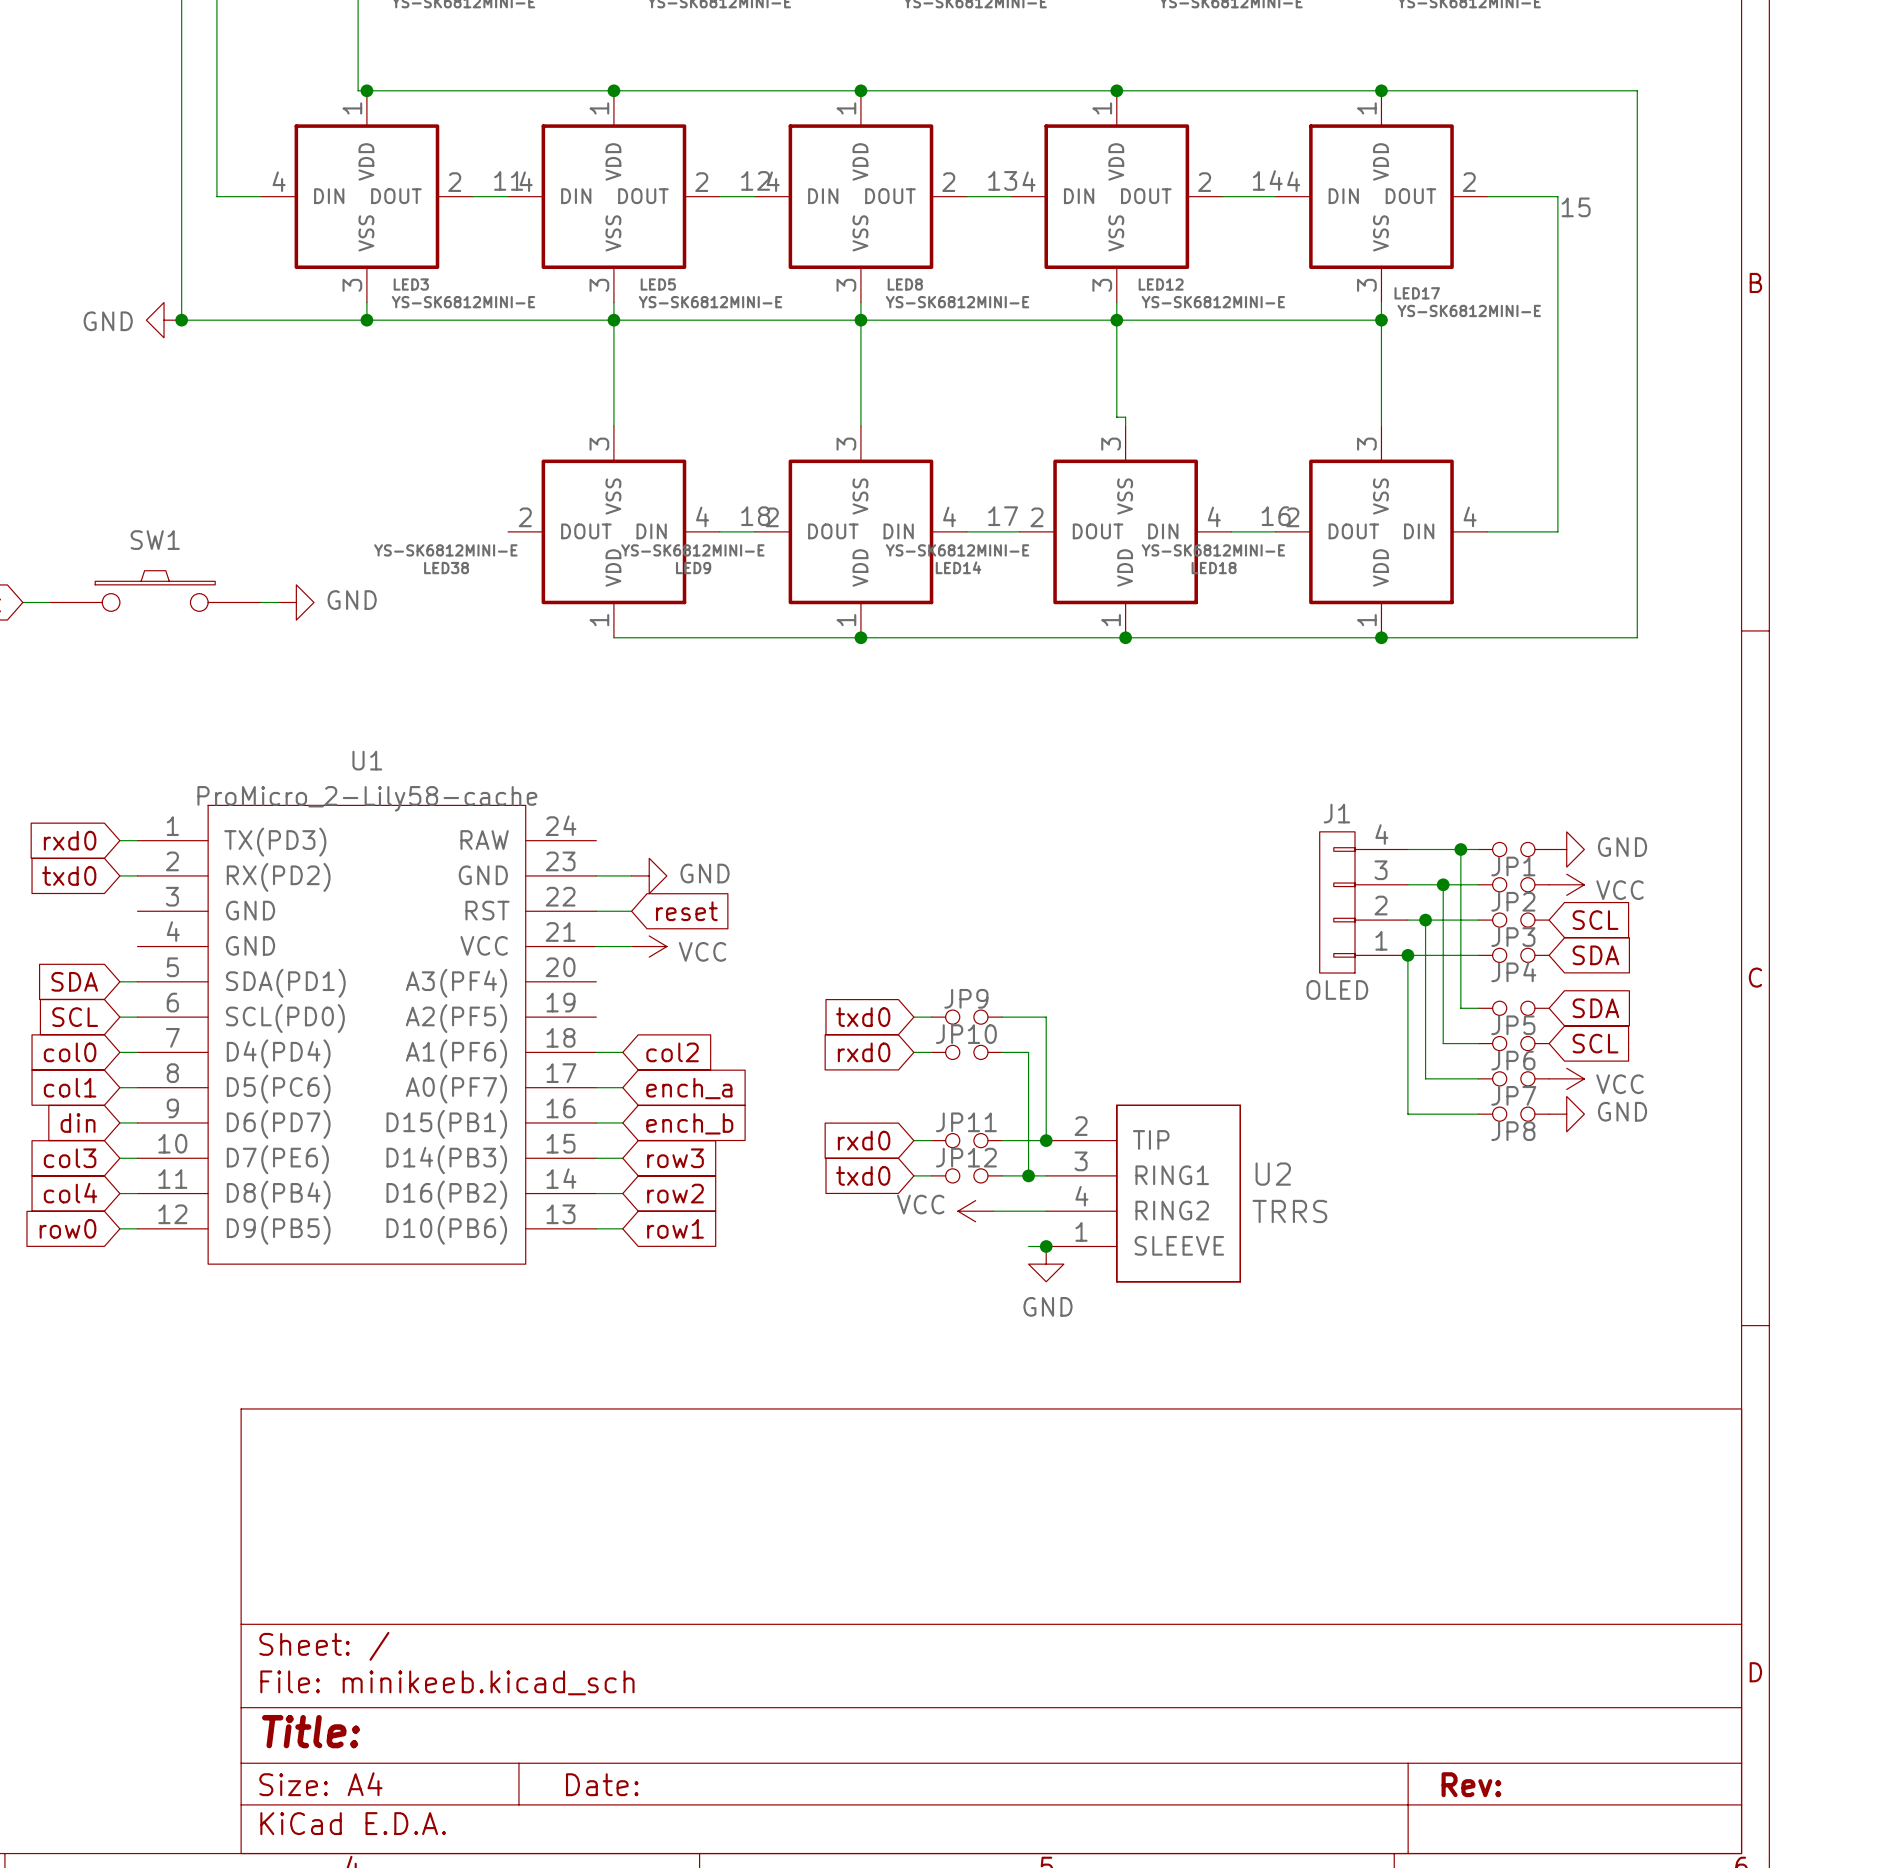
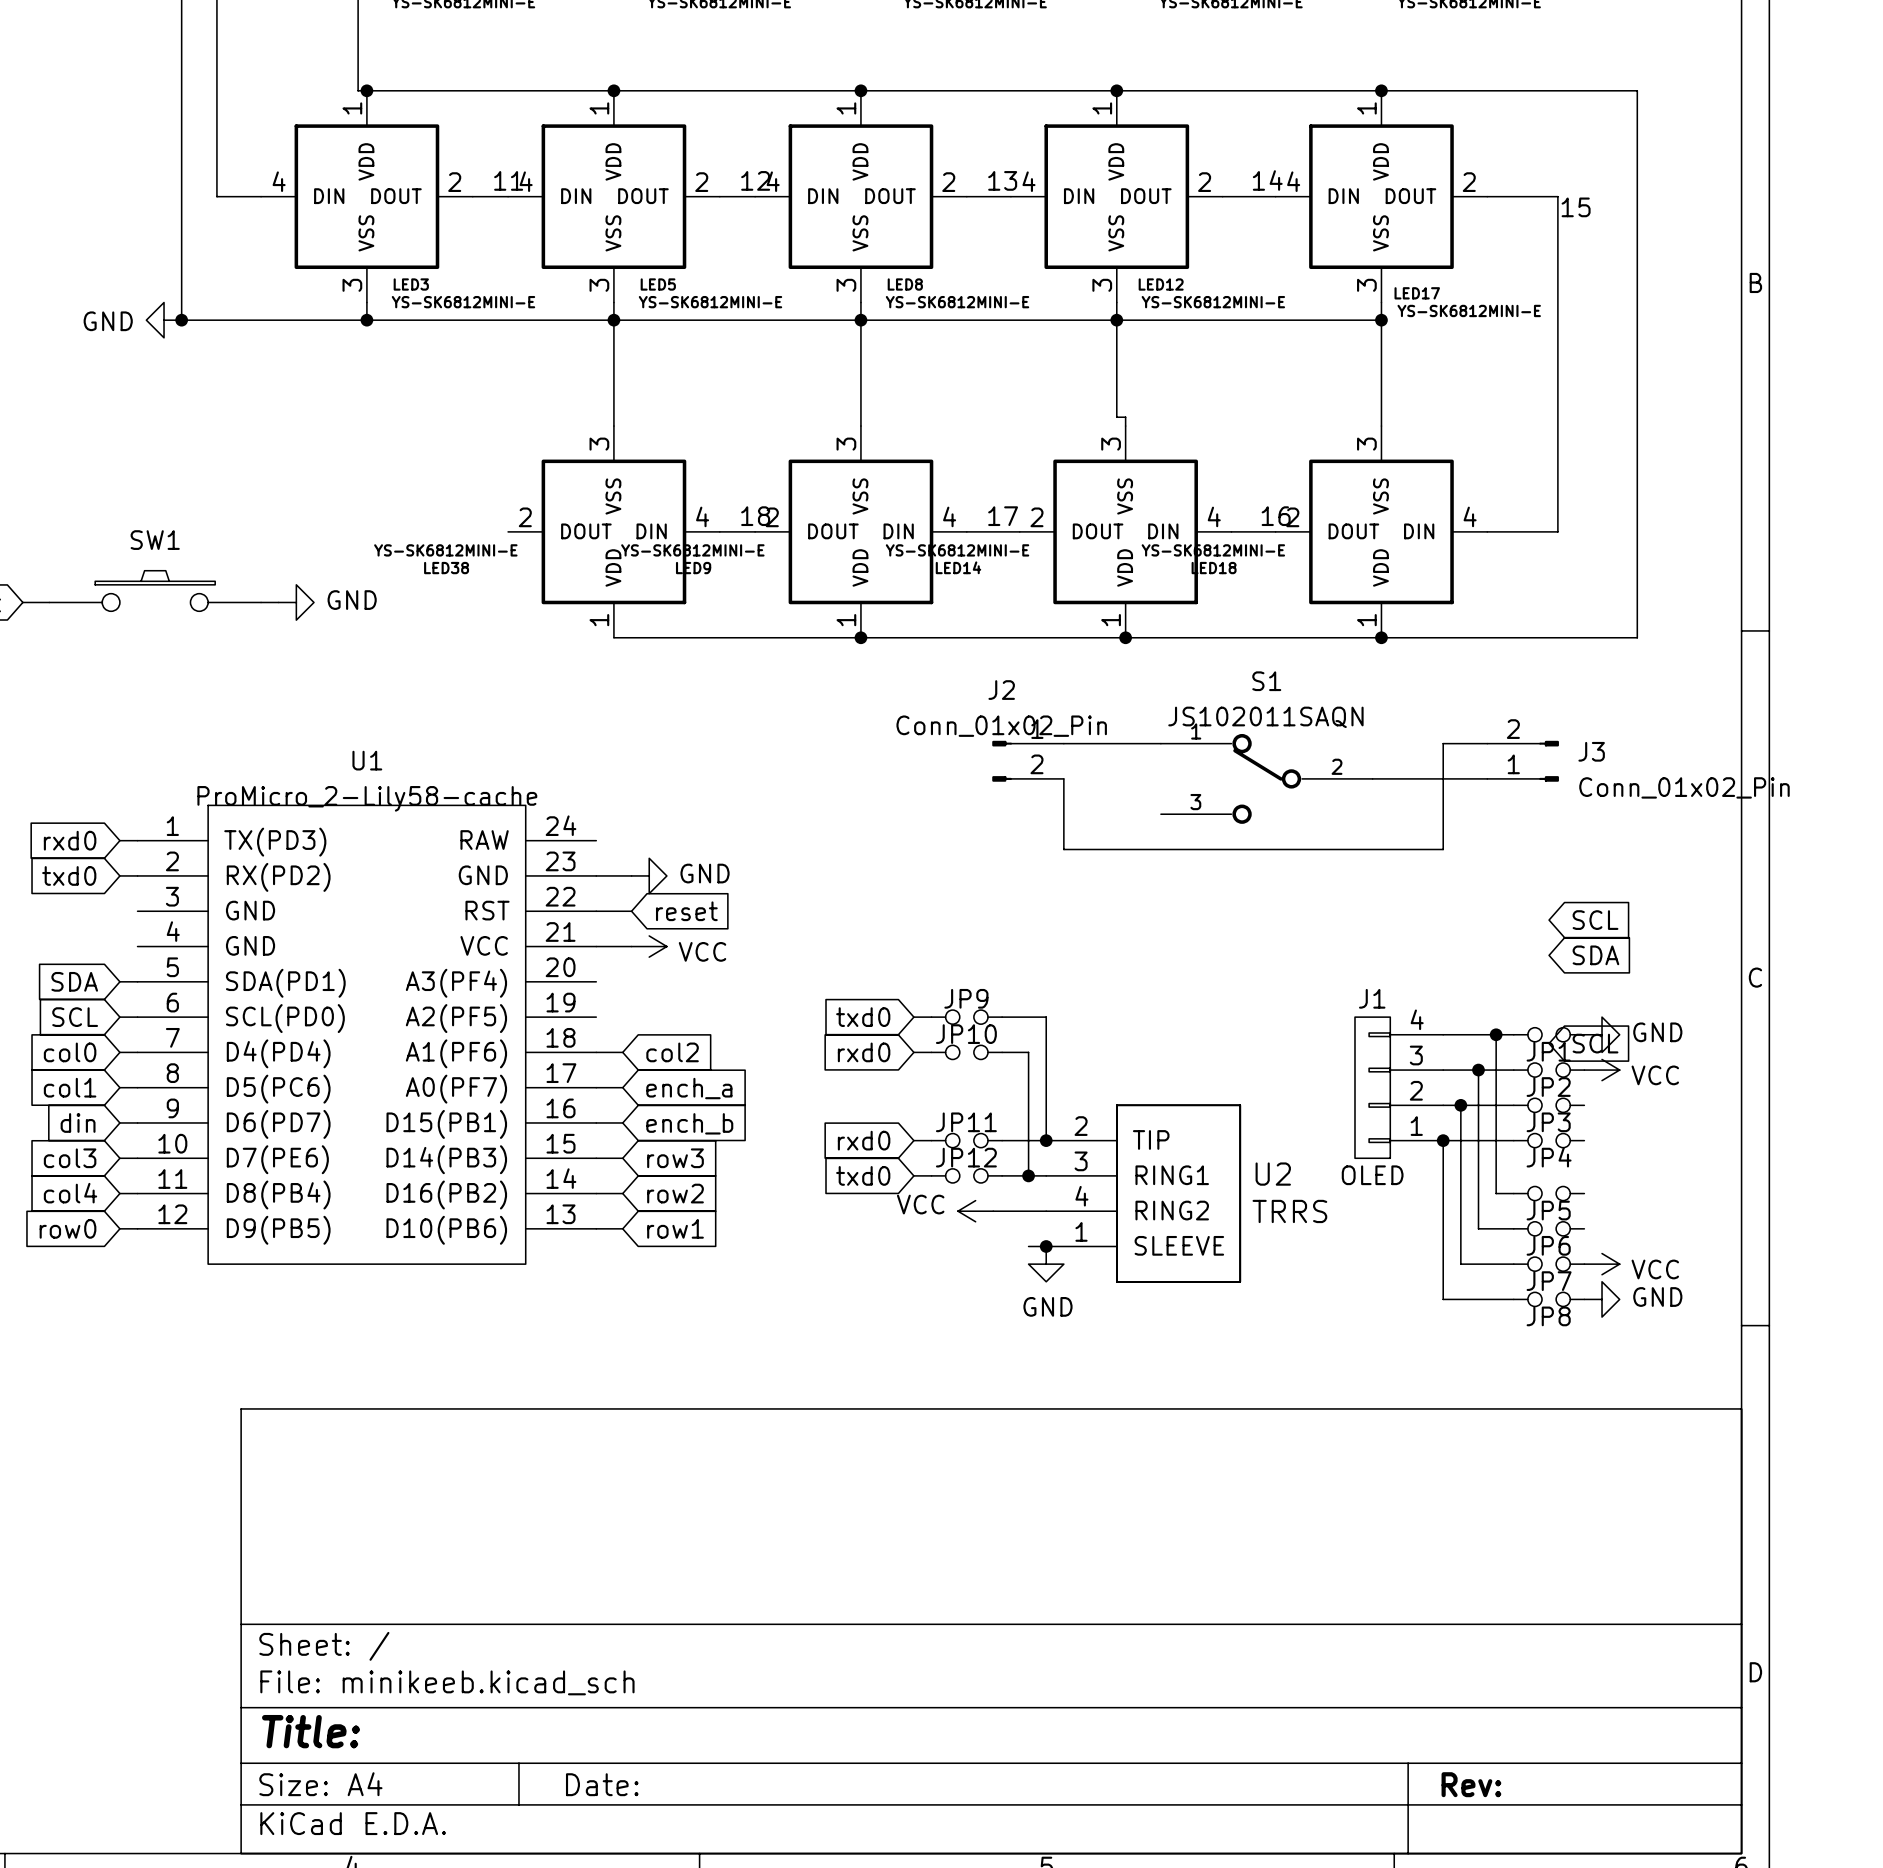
wire: none -> (1063, 743) (1160, 743)
J2: none -> Conn_01x02_Pin (1028, 761)
J3: none -> Conn_01x02_Pin (1523, 761)
wire: none -> (1063, 778) (1063, 849) (1407, 849)
S1: none -> JS102011SAQN (1266, 778)
wire: none -> (1372, 778) (1487, 778)
wire: (1443, 849) (1478, 849) -> (1443, 849) (1443, 743) (1487, 743)
wire: (1460, 849) (1460, 1008) (1478, 1008) -> (1496, 1034) (1496, 1193) (1513, 1193)
junction: (1460, 849) -> none
JP1 position: (1513, 849) -> (1549, 1034)
power symbol: GND (1566, 849) -> none
wire: (1407, 884) (1478, 884) -> (1443, 1070) (1513, 1070)
wire: (1443, 884) (1443, 1043) (1478, 1043) -> (1478, 1070) (1478, 1228) (1513, 1228)
junction: (1443, 884) -> none
JP2 position: (1513, 884) -> (1549, 1070)
power symbol: VCC (1566, 884) -> none
J1 position: (1363, 902) -> (1399, 1087)
wire: (1407, 920) (1478, 920) -> (1443, 1105) (1513, 1105)
wire: (1425, 920) (1425, 1078) (1478, 1078) -> (1460, 1105) (1460, 1264) (1513, 1264)
junction: (1425, 920) -> none
JP3 position: (1513, 920) -> (1549, 1105)
junction: (1407, 955) -> none
wire: (1478, 955) (1407, 955) (1407, 1114) (1478, 1114) -> (1513, 1140) (1443, 1140) (1443, 1299) (1513, 1299)
JP4 position: (1513, 955) -> (1549, 1140)
JP5 position: (1513, 1008) -> (1549, 1193)
global label: SDA (1595, 1008) -> none
wire: none -> (1443, 1034) (1513, 1034)
junction: none -> (1496, 1034)
JP6 position: (1513, 1043) -> (1549, 1228)
junction: none -> (1478, 1070)
JP7 position: (1513, 1078) -> (1549, 1264)
power symbol position: VCC (1566, 1078) -> VCC (1602, 1070)
junction: none -> (1460, 1105)
JP8 position: (1513, 1114) -> (1549, 1299)
power symbol position: GND (1566, 1114) -> GND (1602, 1034)
junction: none -> (1443, 1140)
power symbol: none -> VCC (1602, 1264)
power symbol: none -> GND (1602, 1299)

